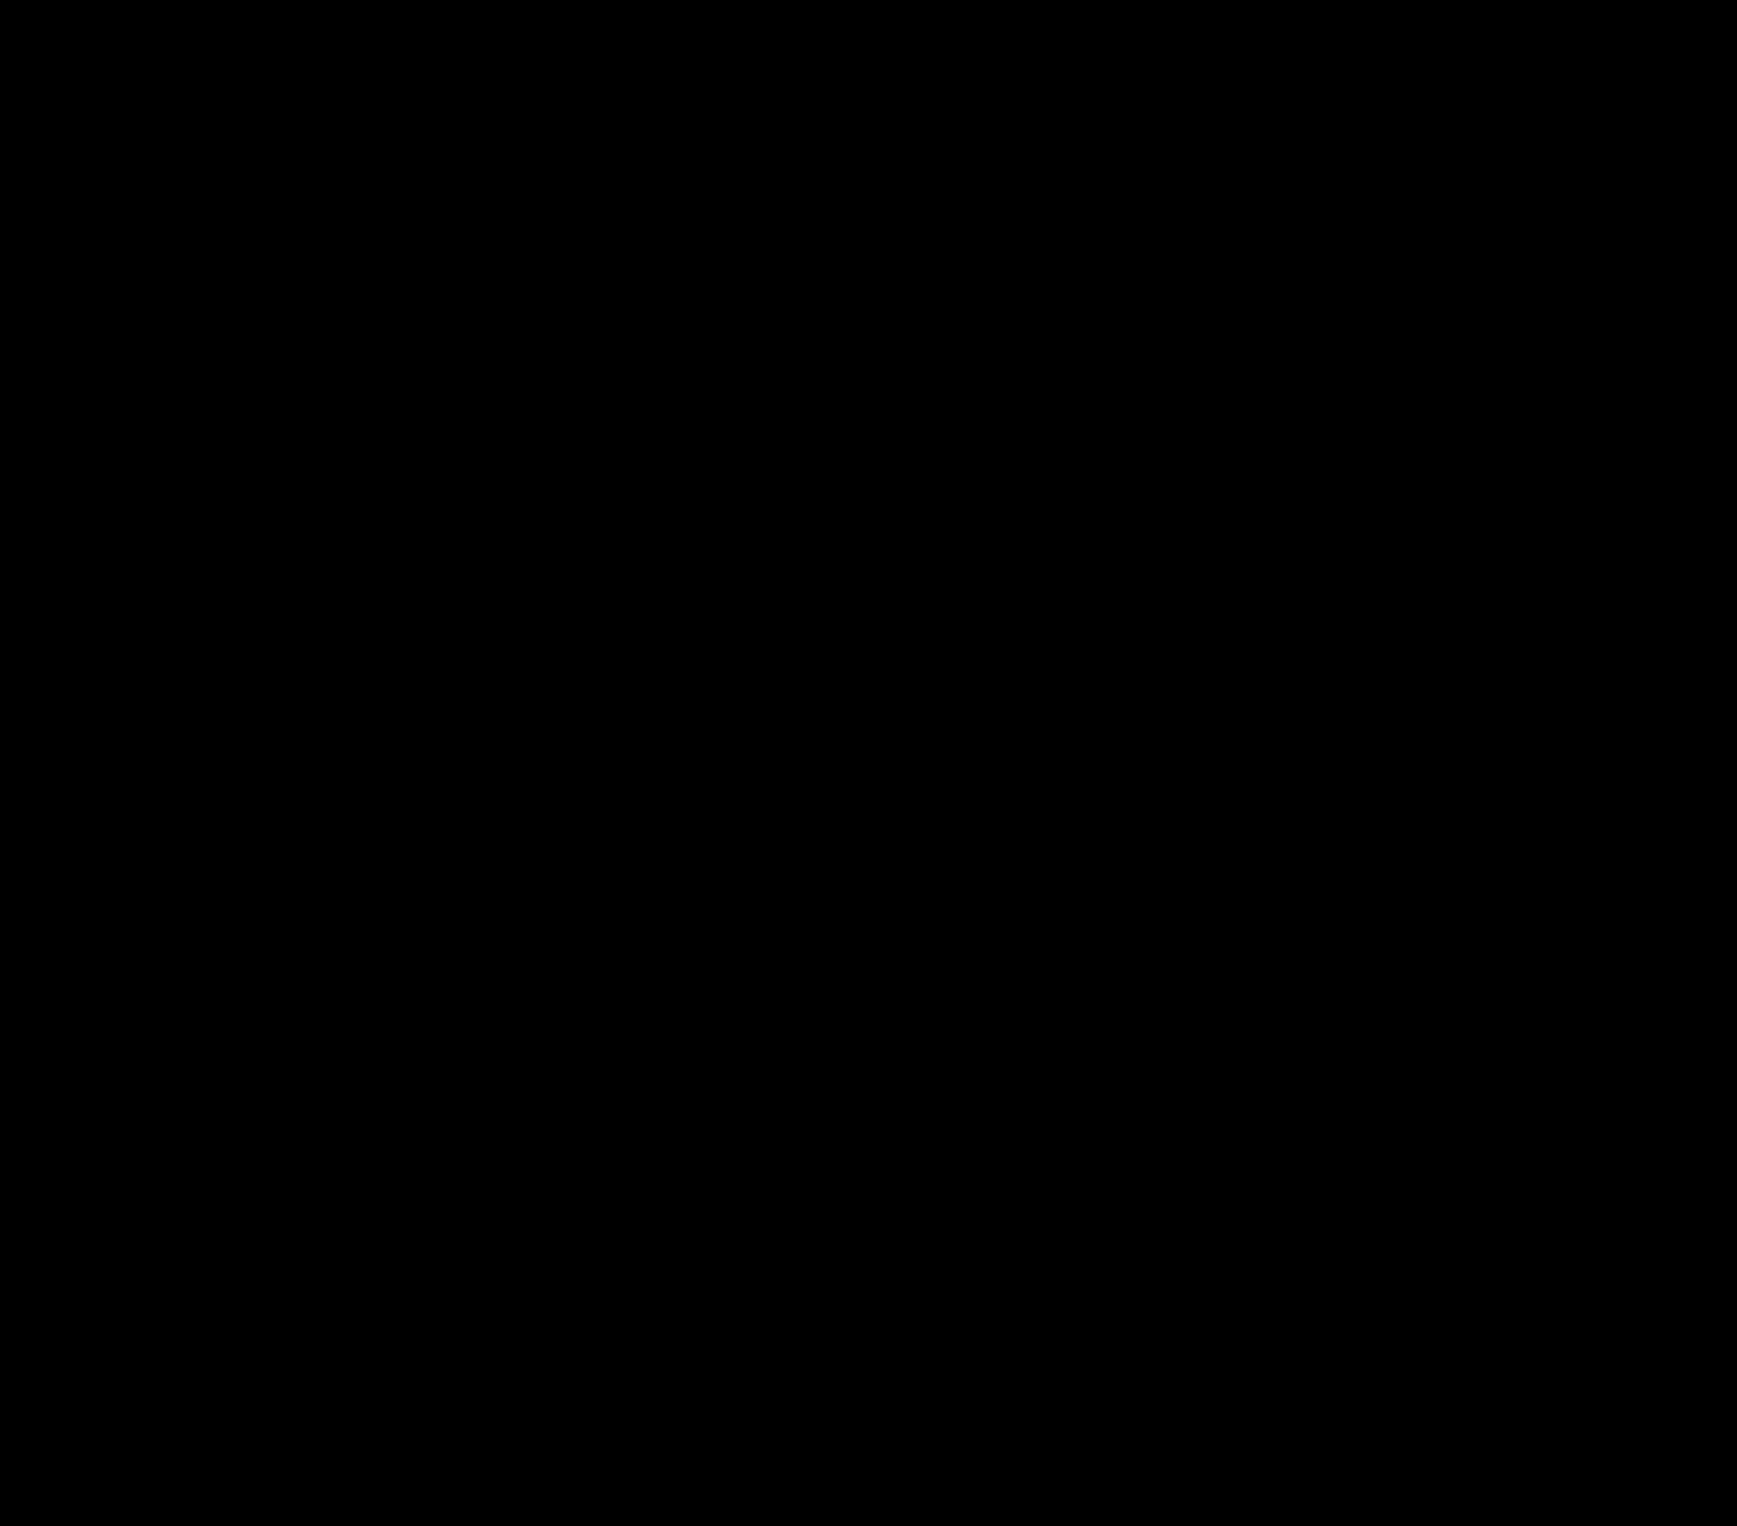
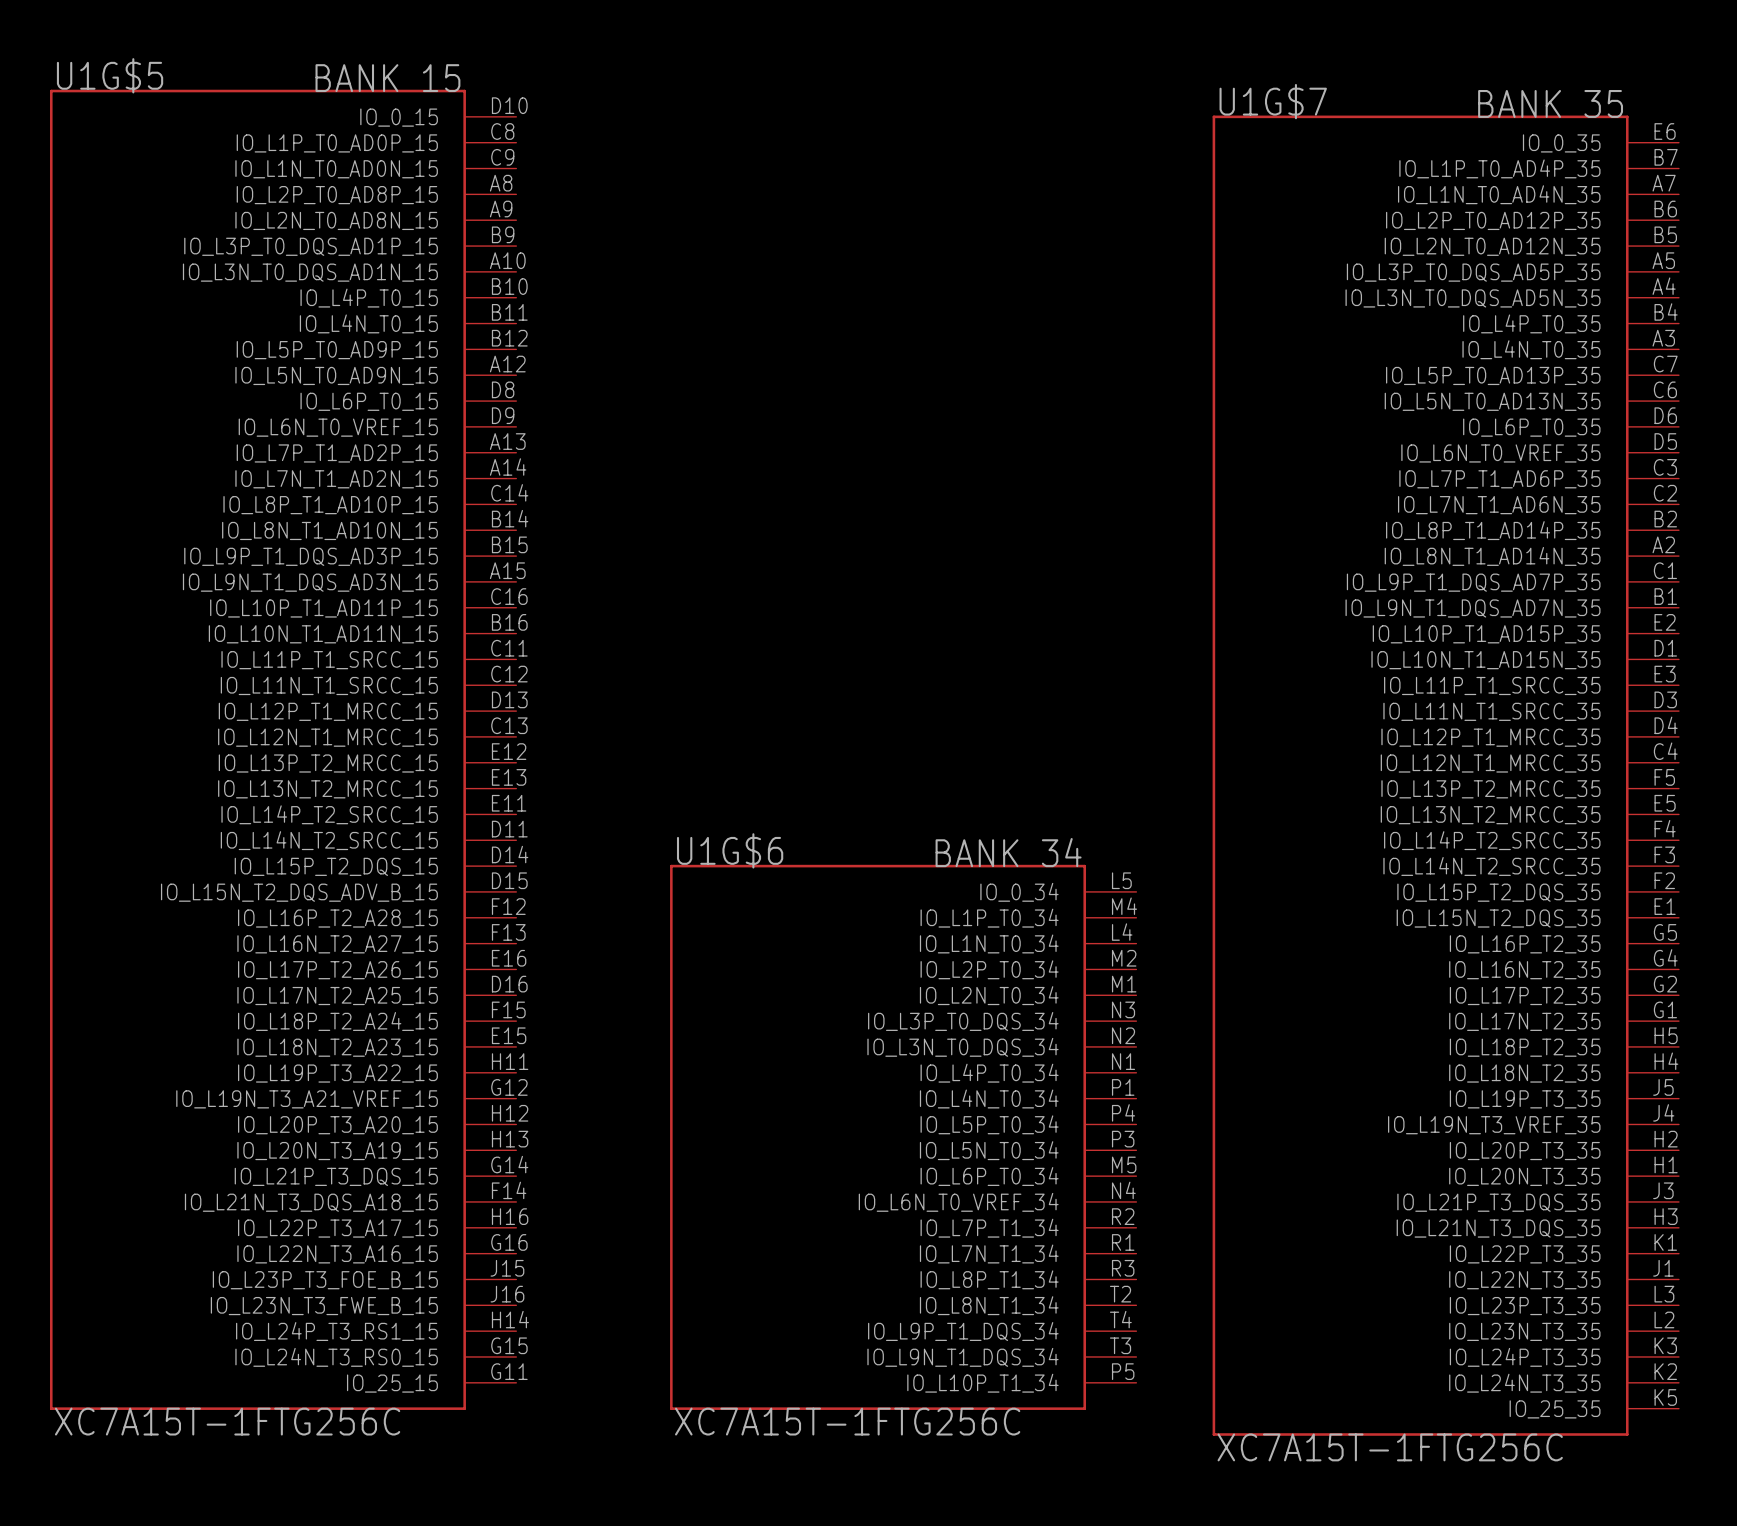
U1G$5: none -> XC7A15T-1FTG256C (283, 749)
U1G$7: none -> XC7A15T-1FTG256C (1445, 775)
U1G$6: none -> XC7A15T-1FTG256C (903, 1137)

